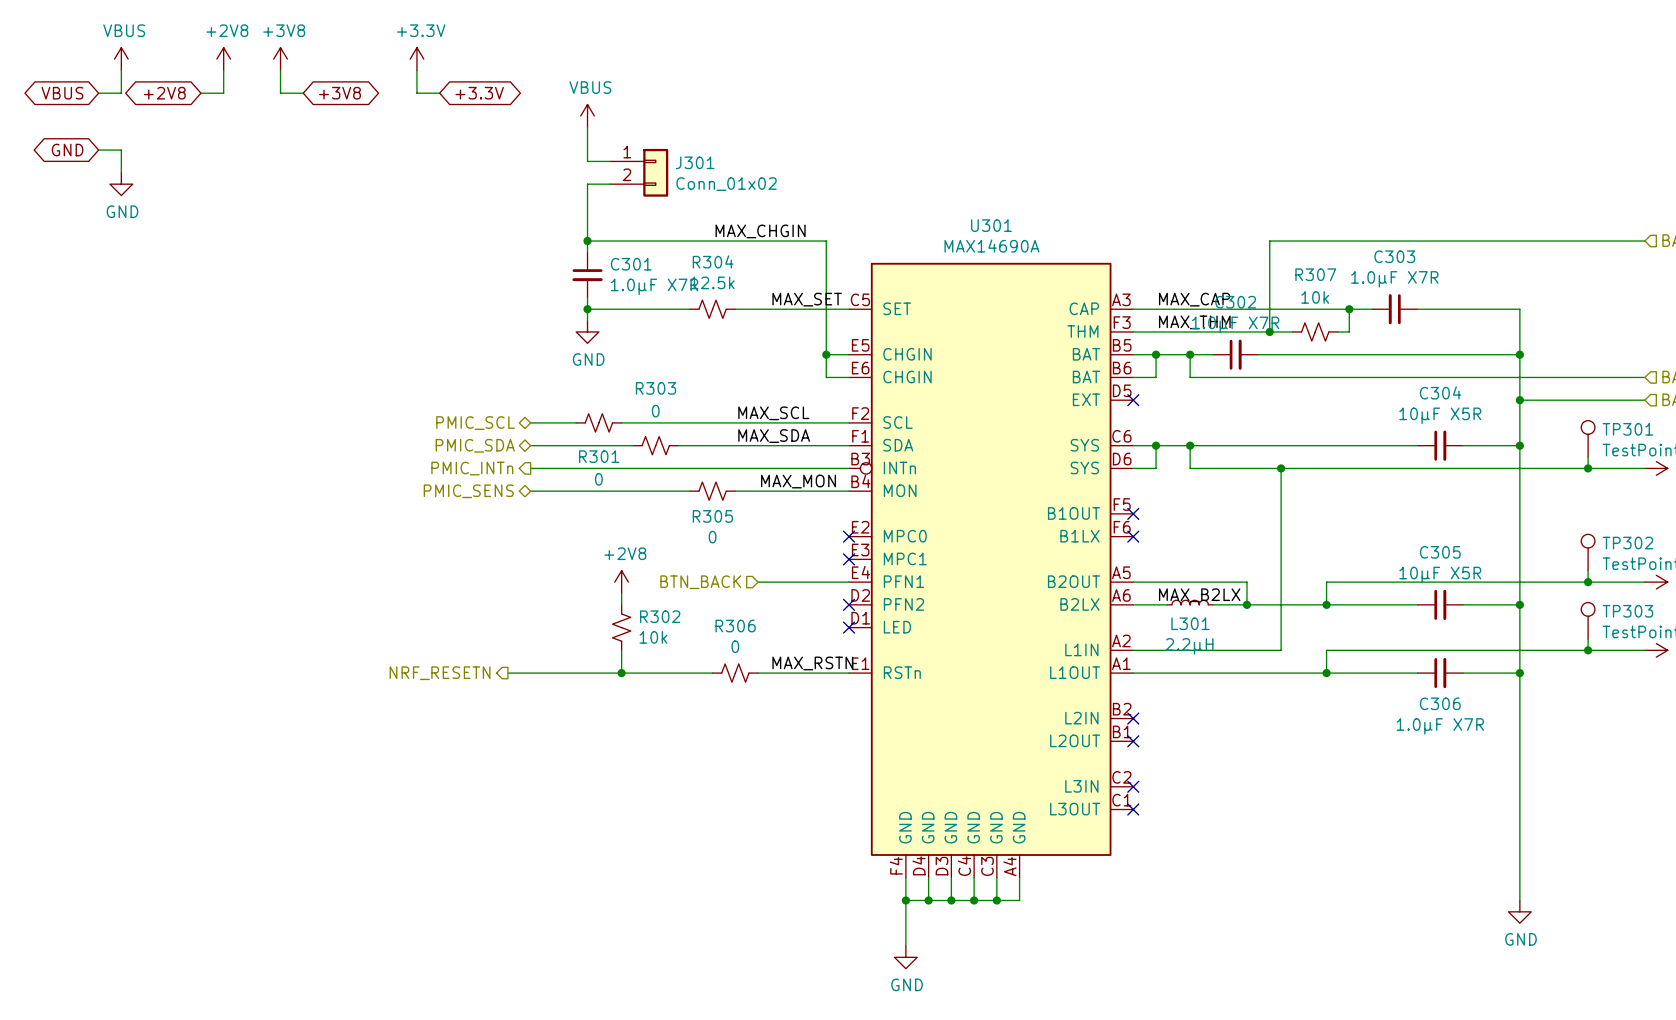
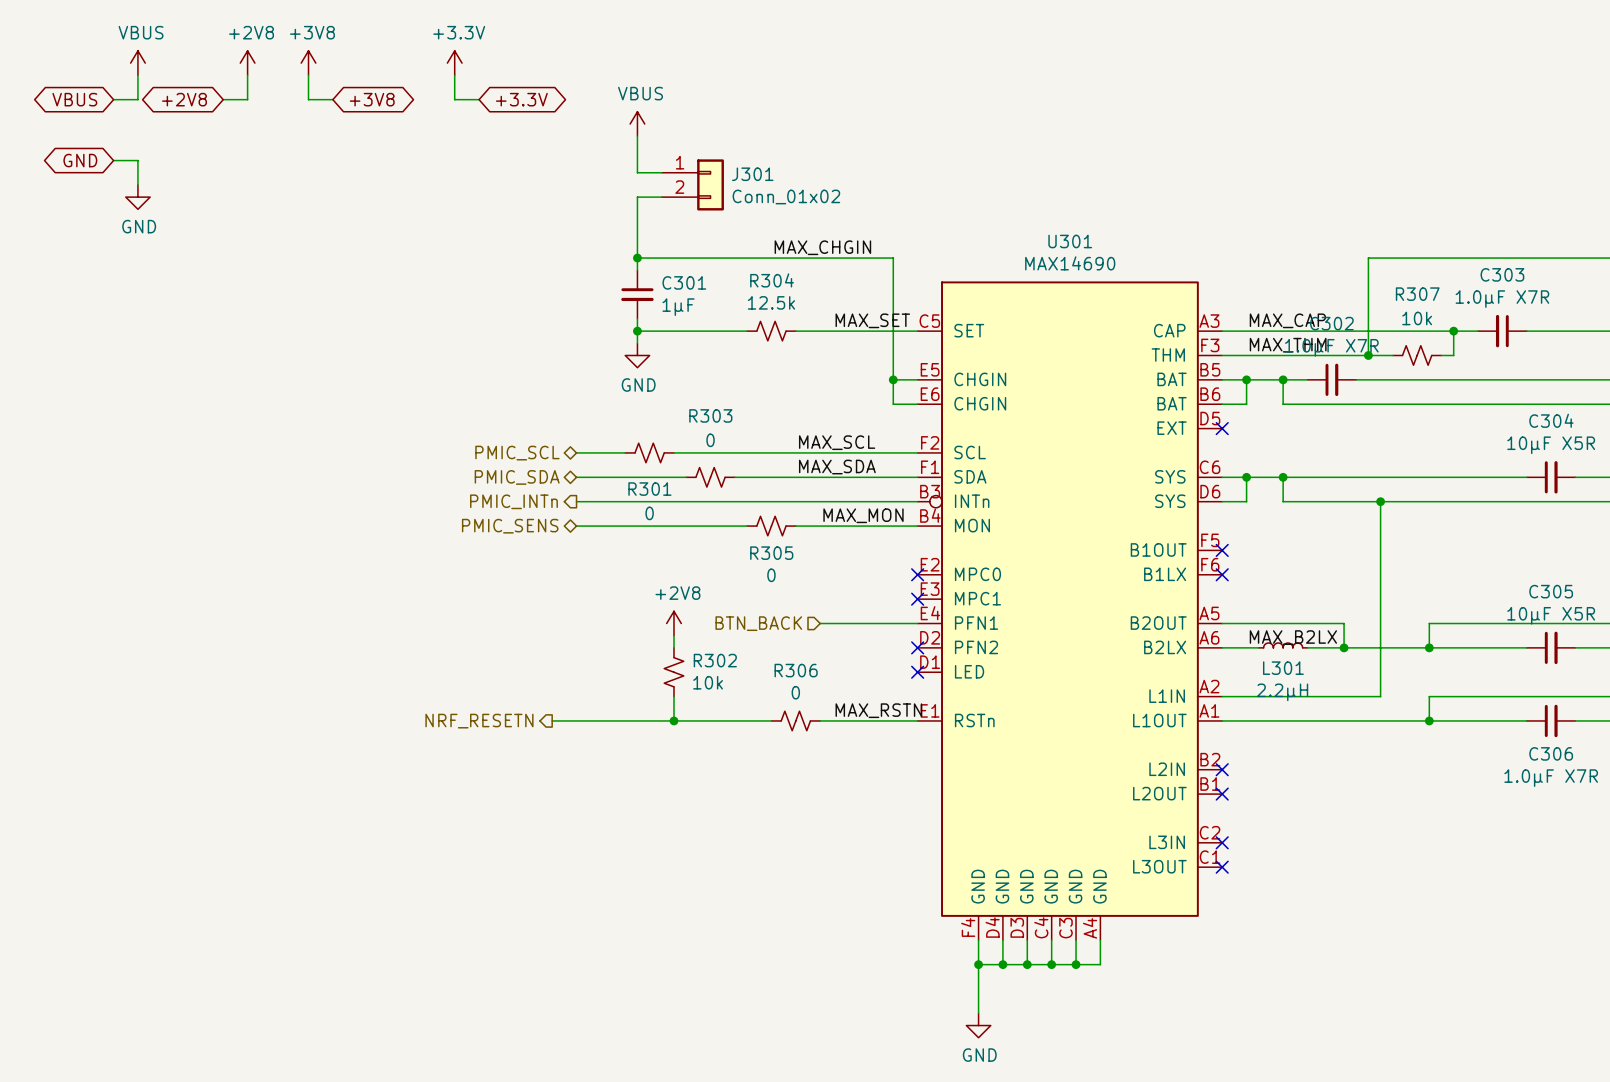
U301 value: MAX14690A (991, 246) -> MAX14690 (1070, 263)
C301 value: 1.0µF X7R (654, 286) -> 1µF (678, 307)

